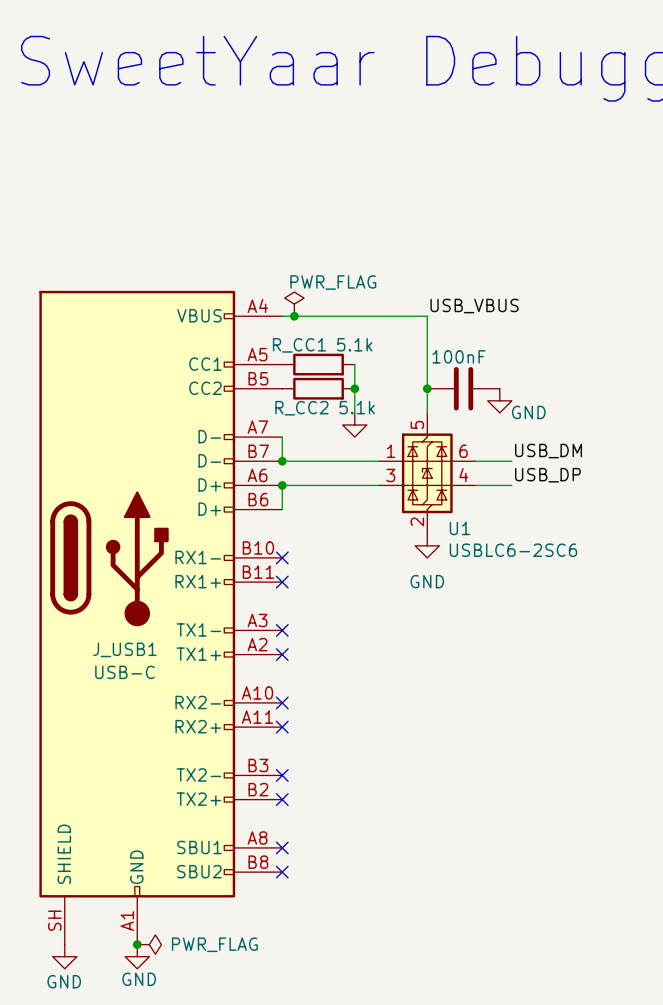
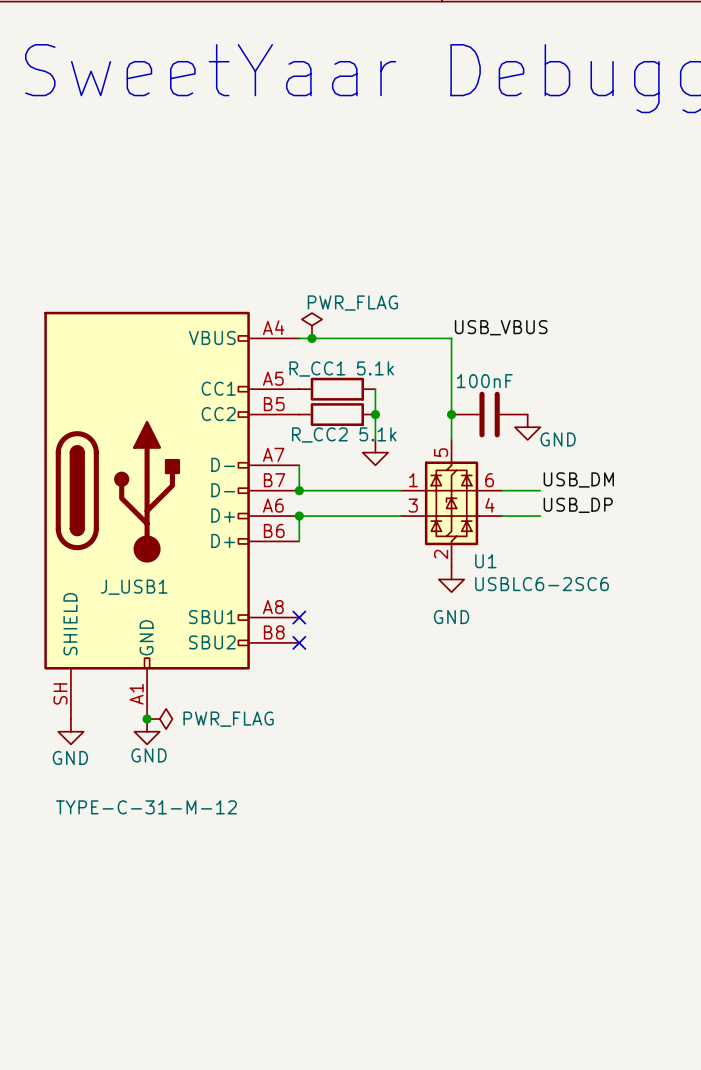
J_USB1 symbol: [39, 290, 283, 945] -> [44, 311, 300, 720]
no-connect mark: (282, 557) -> none
no-connect mark: none -> (299, 642)
no-connect mark: (282, 630) -> none
J_USB1 name position: J_USB1 (124, 649) -> J_USB1 (134, 587)
no-connect mark: (282, 654) -> none
J_USB1 value: USB-C (124, 672) -> TYPE-C-31-M-12 (146, 807)
junction: none -> (147, 719)
power symbol: none -> PWR_FLAG (159, 719)
power symbol: none -> GND (70, 731)
power symbol: none -> GND (147, 731)
no-connect mark: (282, 702) -> none
no-connect mark: (282, 727) -> none
no-connect mark: (282, 775) -> none
no-connect mark: (282, 799) -> none
no-connect mark: (282, 847) -> none
no-connect mark: (282, 872) -> none
junction: (137, 944) -> none
power symbol: PWR_FLAG (149, 944) -> none
power symbol: GND (64, 956) -> none
power symbol: GND (137, 956) -> none

